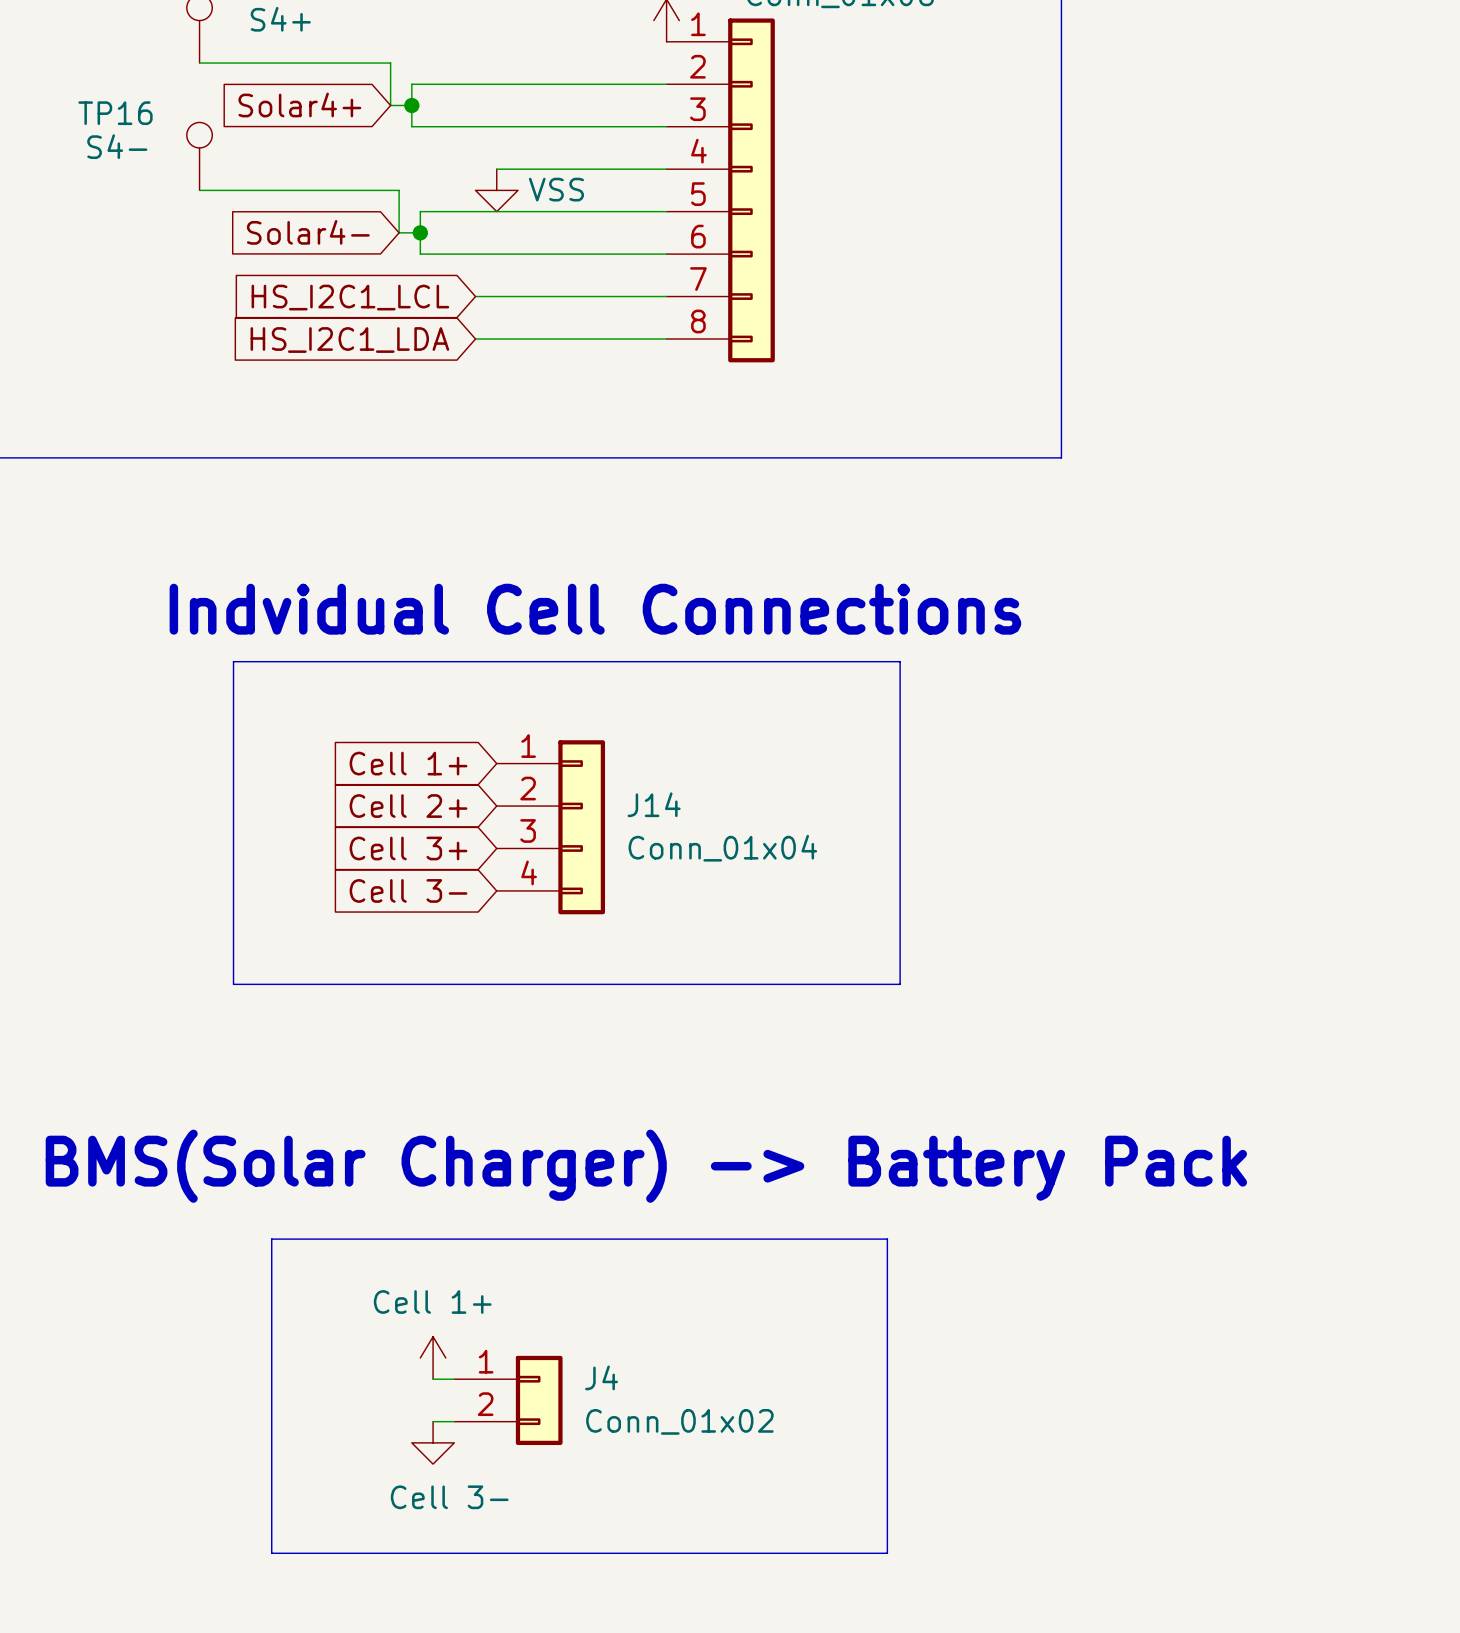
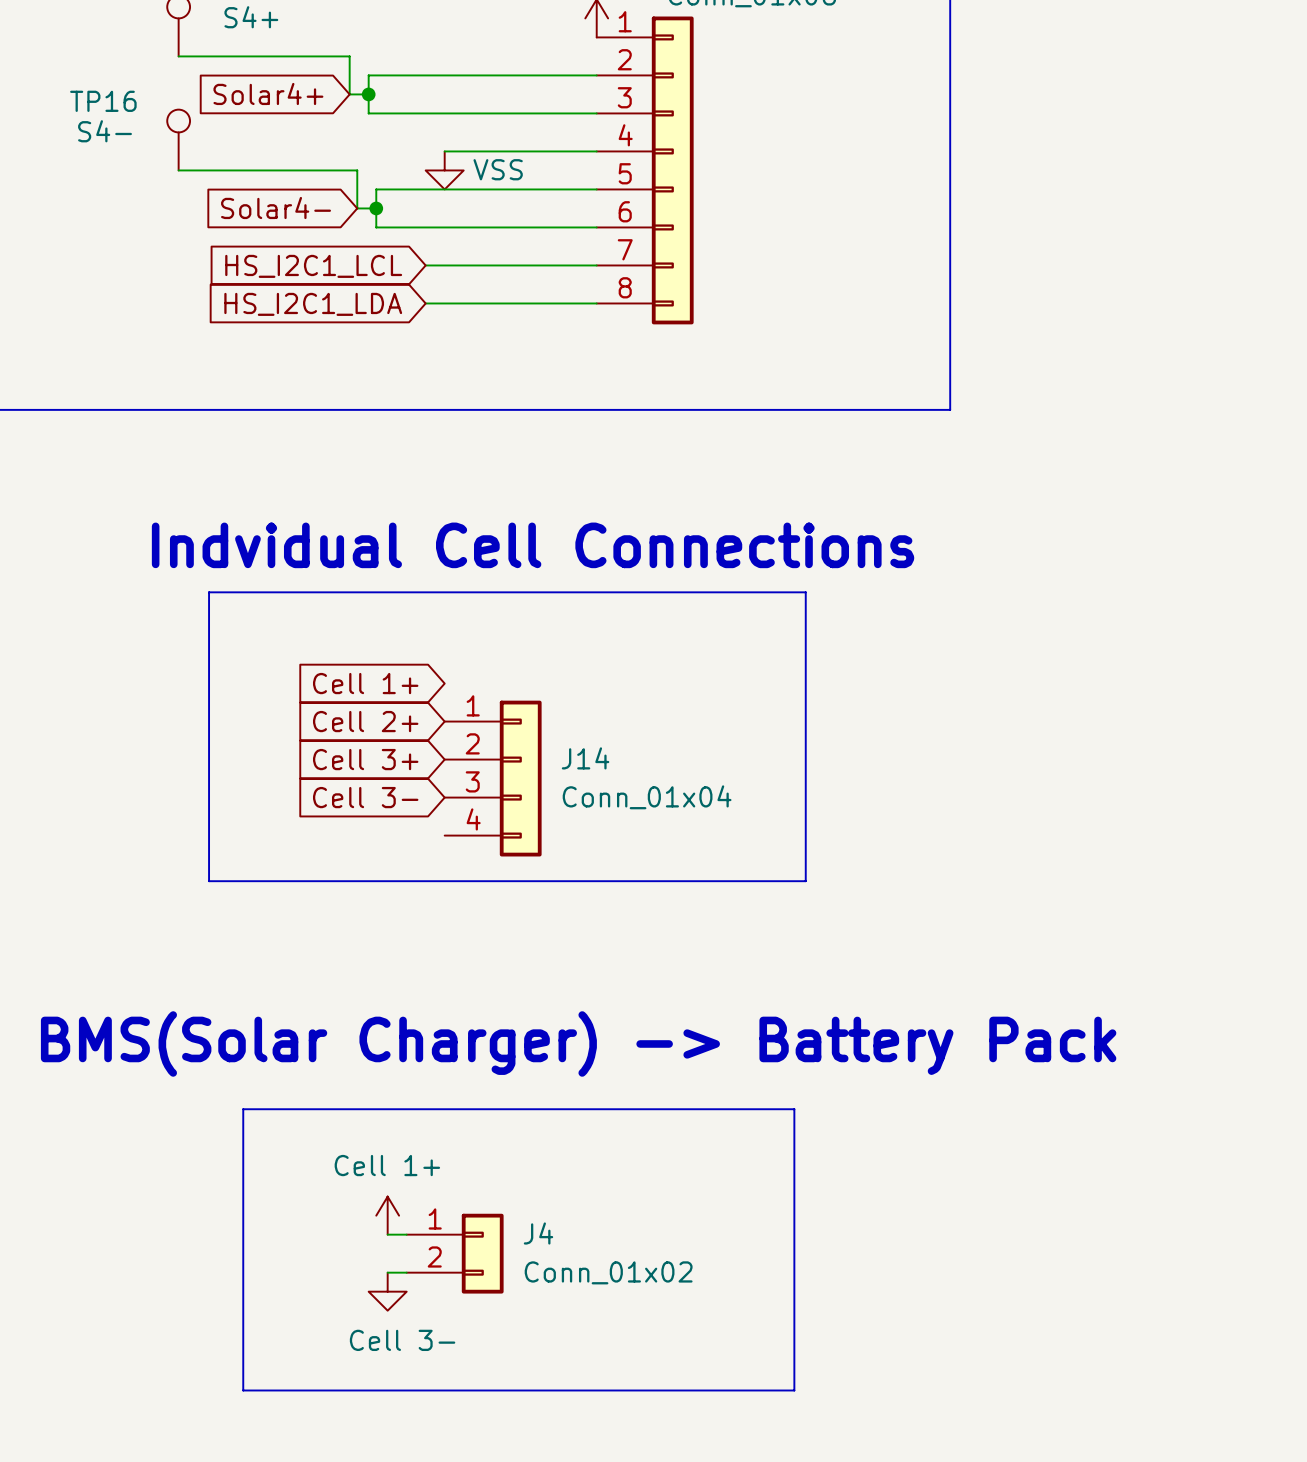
J14 position: (550, 827) -> (493, 778)

